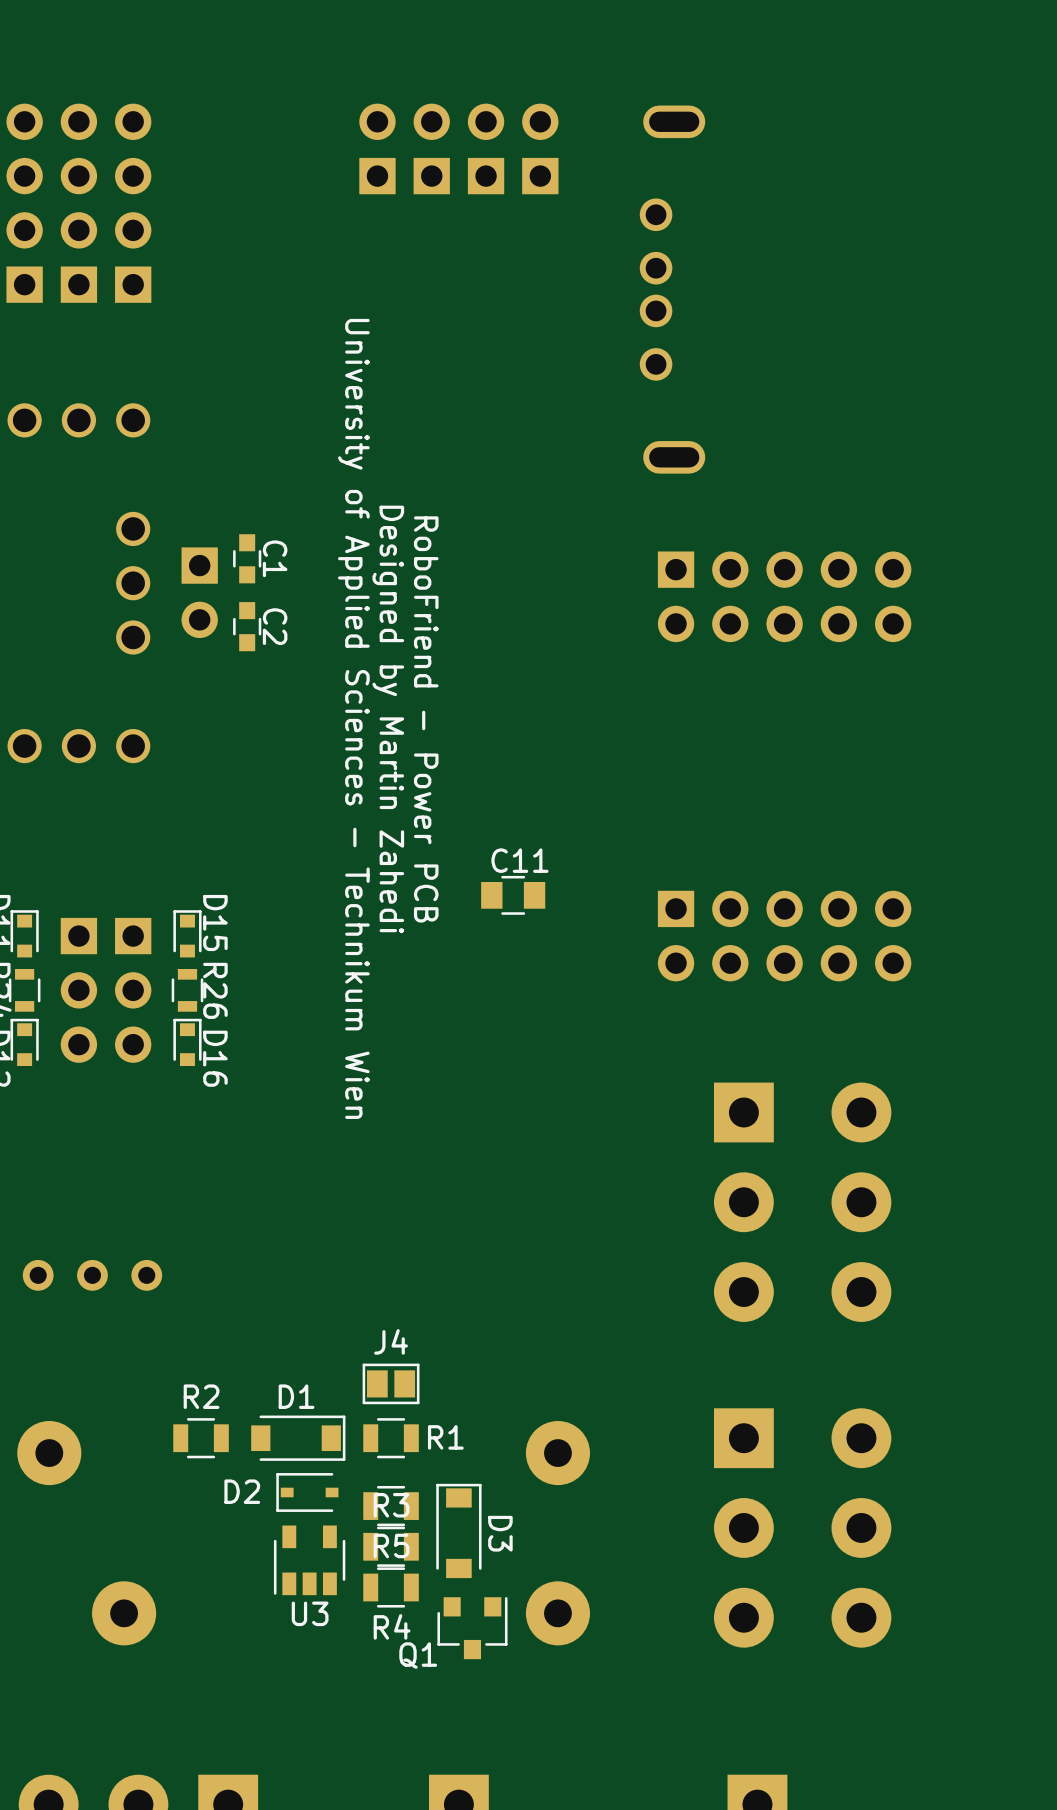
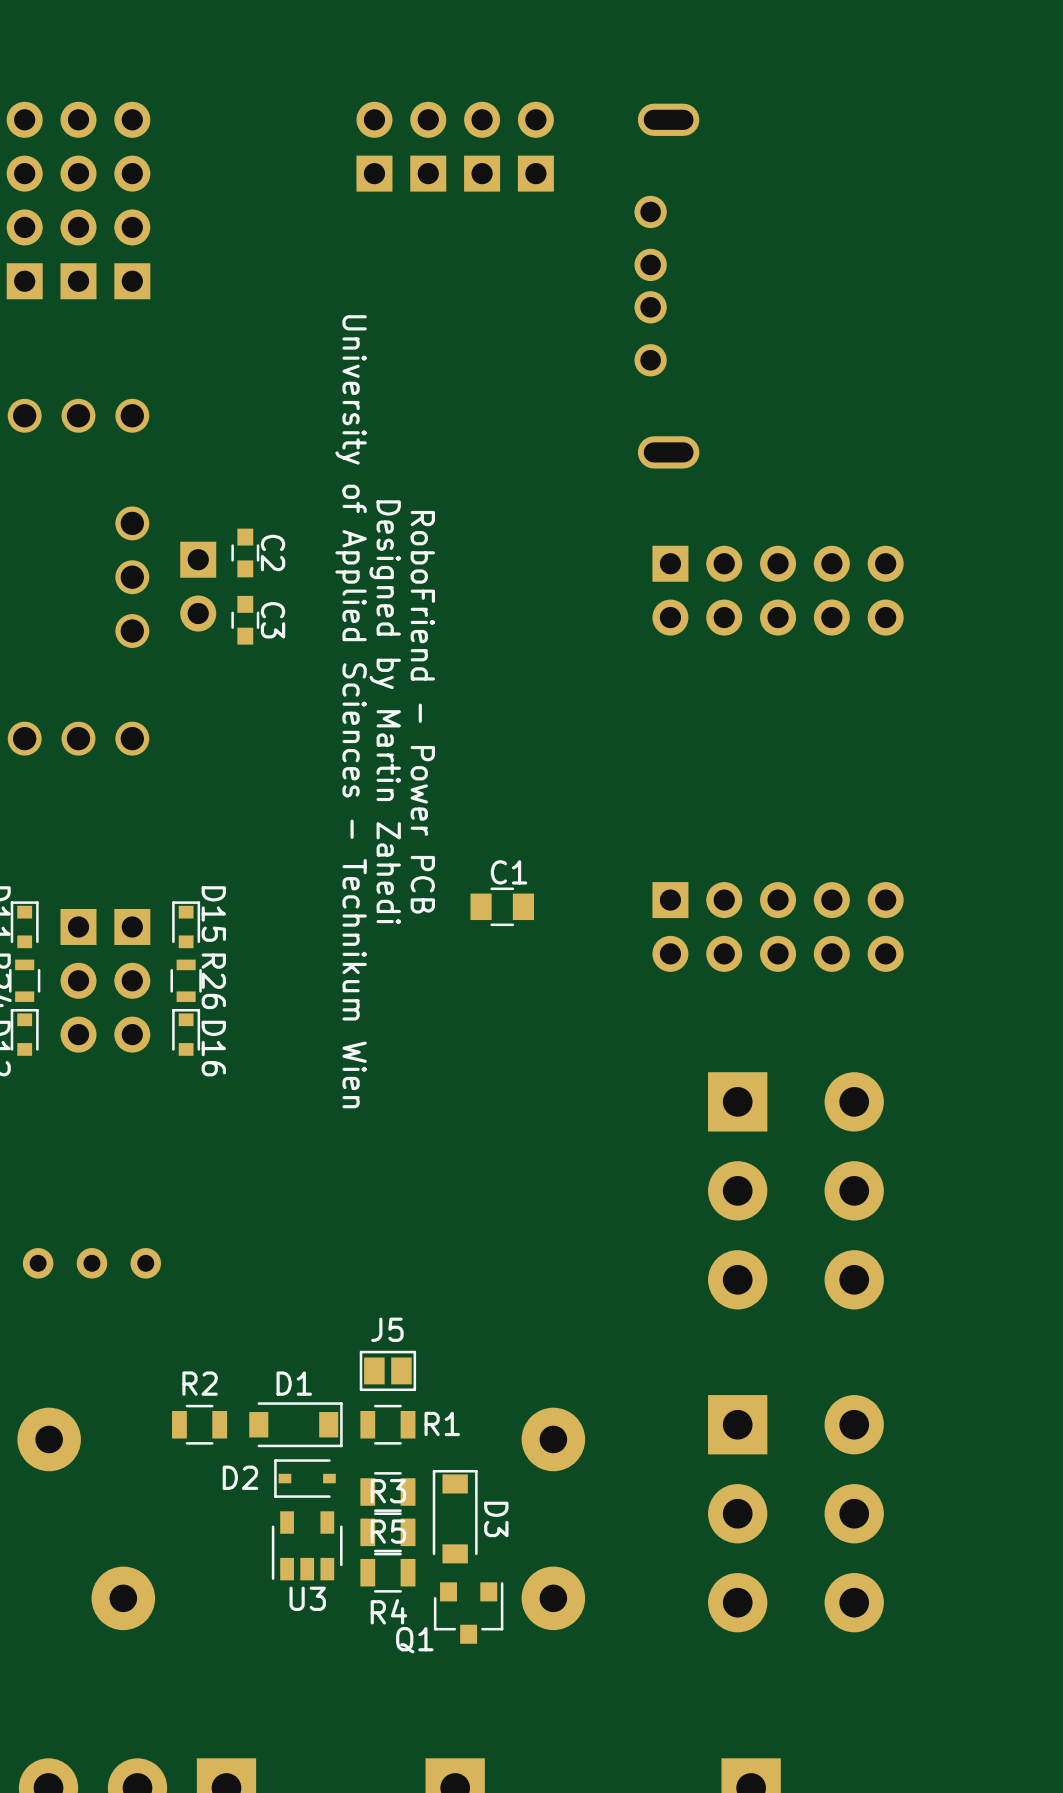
C1 name: C1 (275, 558) -> C2 (273, 552)
C2 name: C2 (275, 626) -> C3 (273, 620)
C11: (513, 895) -> none
C1: none -> (502, 906)
J4 name: J4 (391, 1341) -> J5 (387, 1329)

